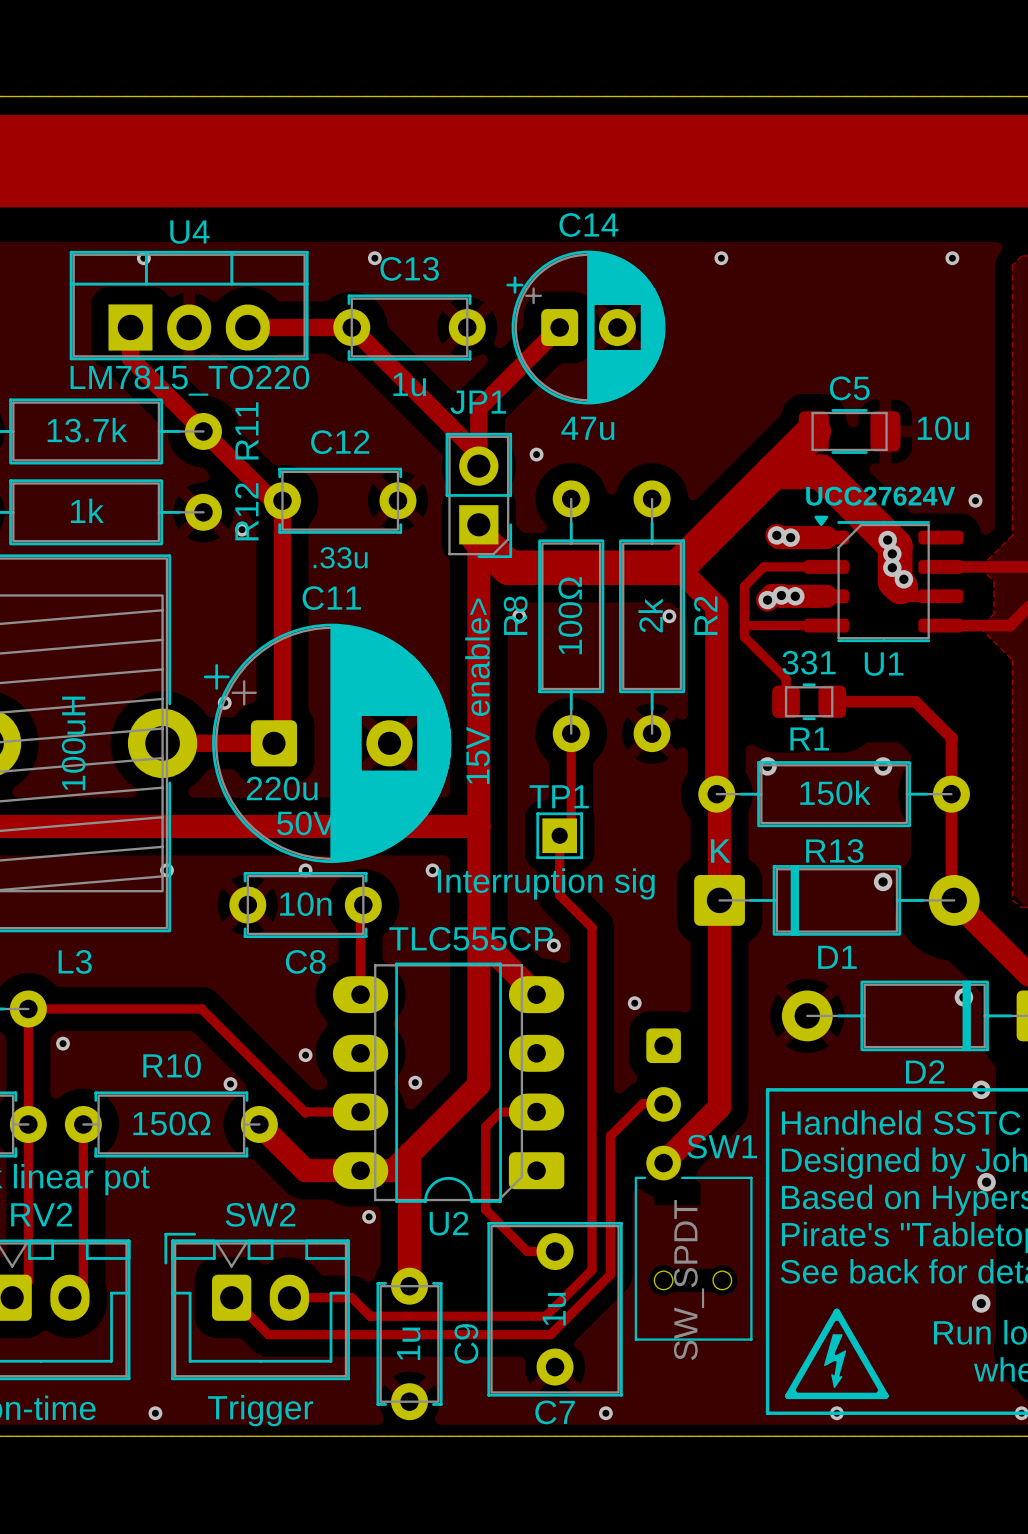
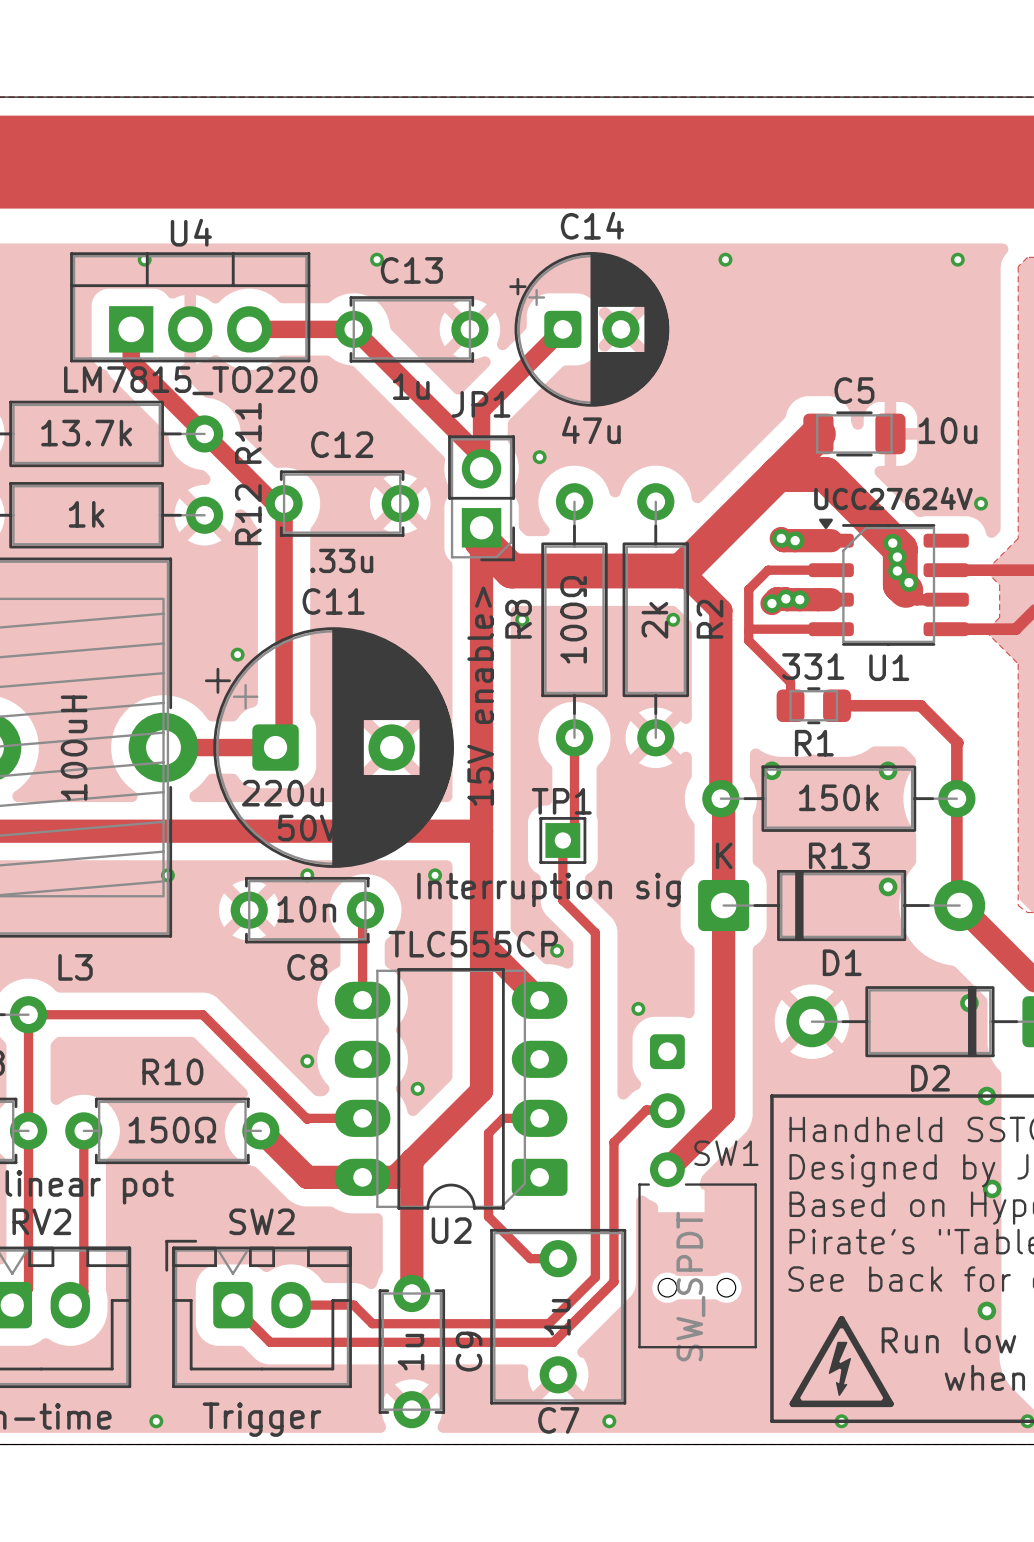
via: (242, 529) -> none
via position: (224, 702) -> (237, 654)
via: (63, 1043) -> none
via: (230, 1084) -> none
via: (369, 1216) -> none

